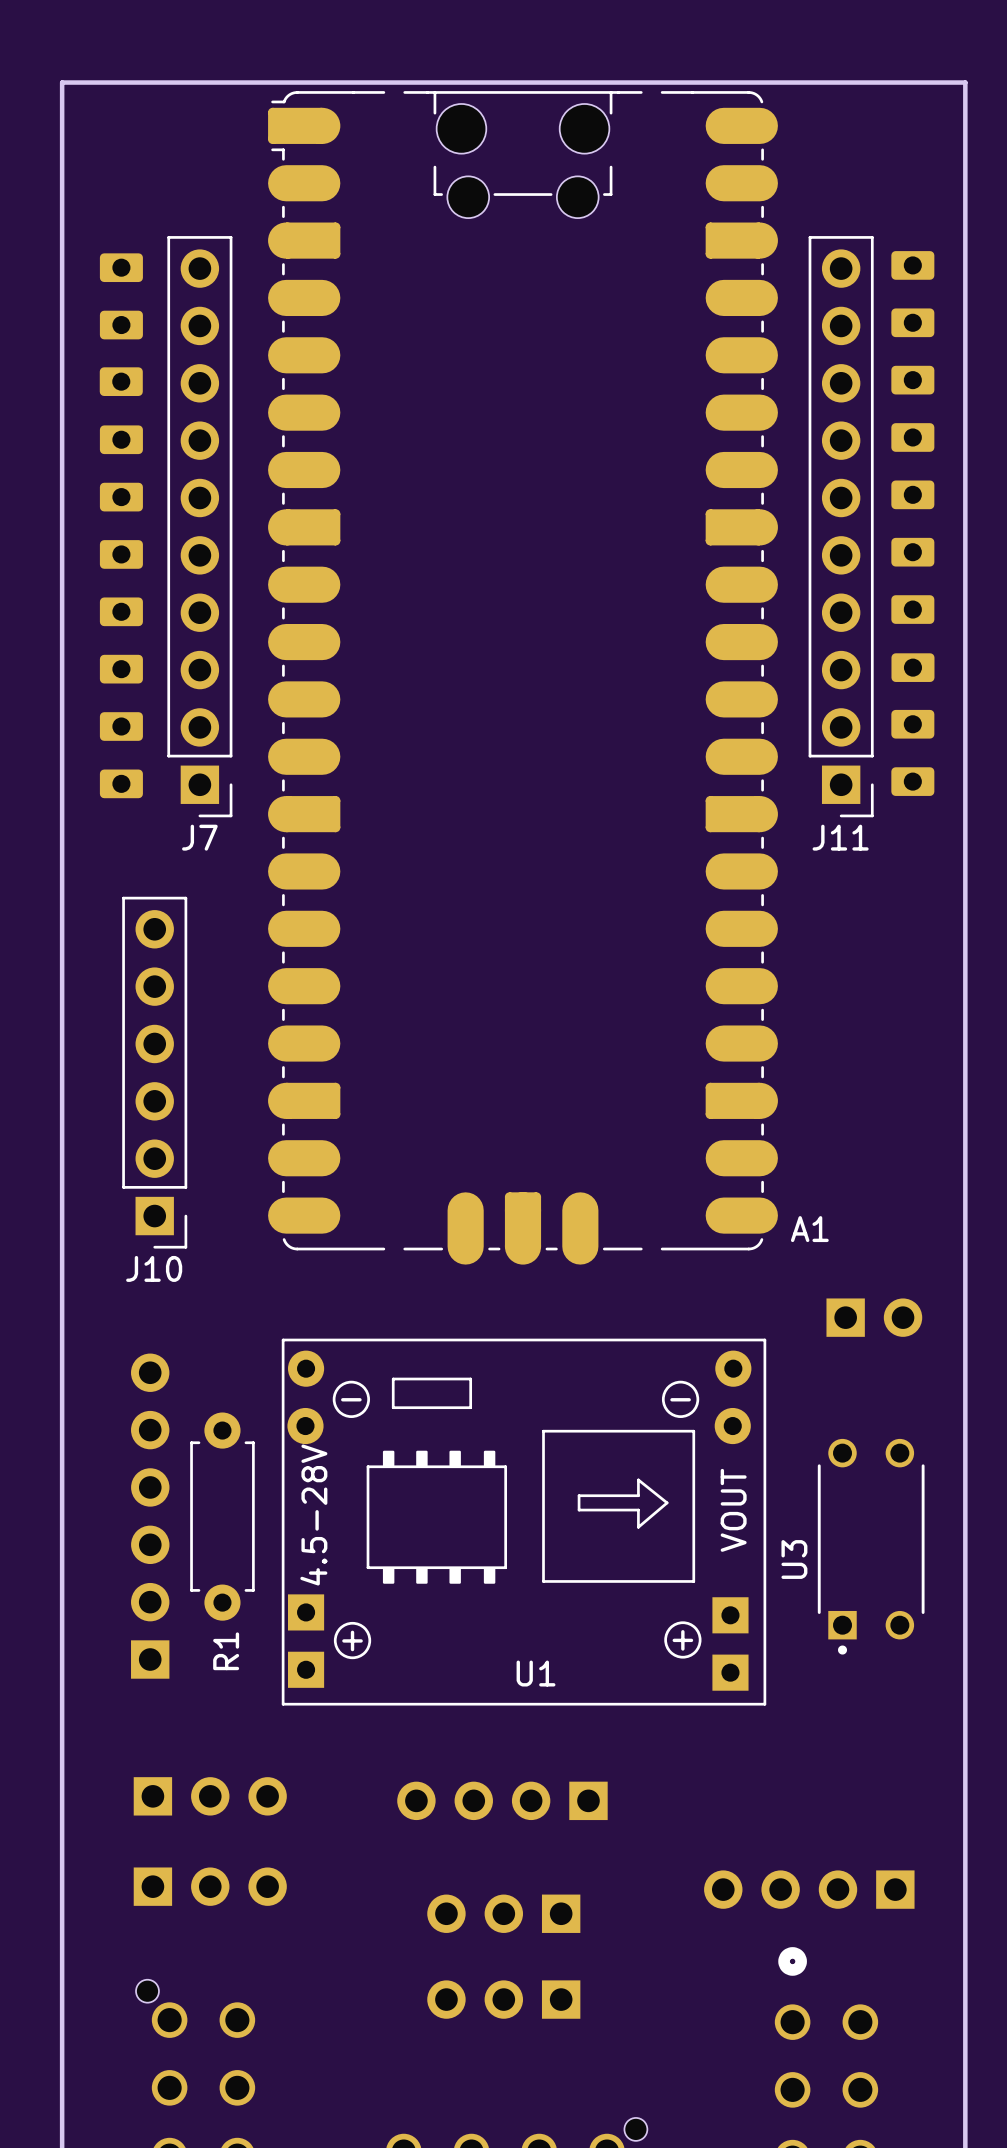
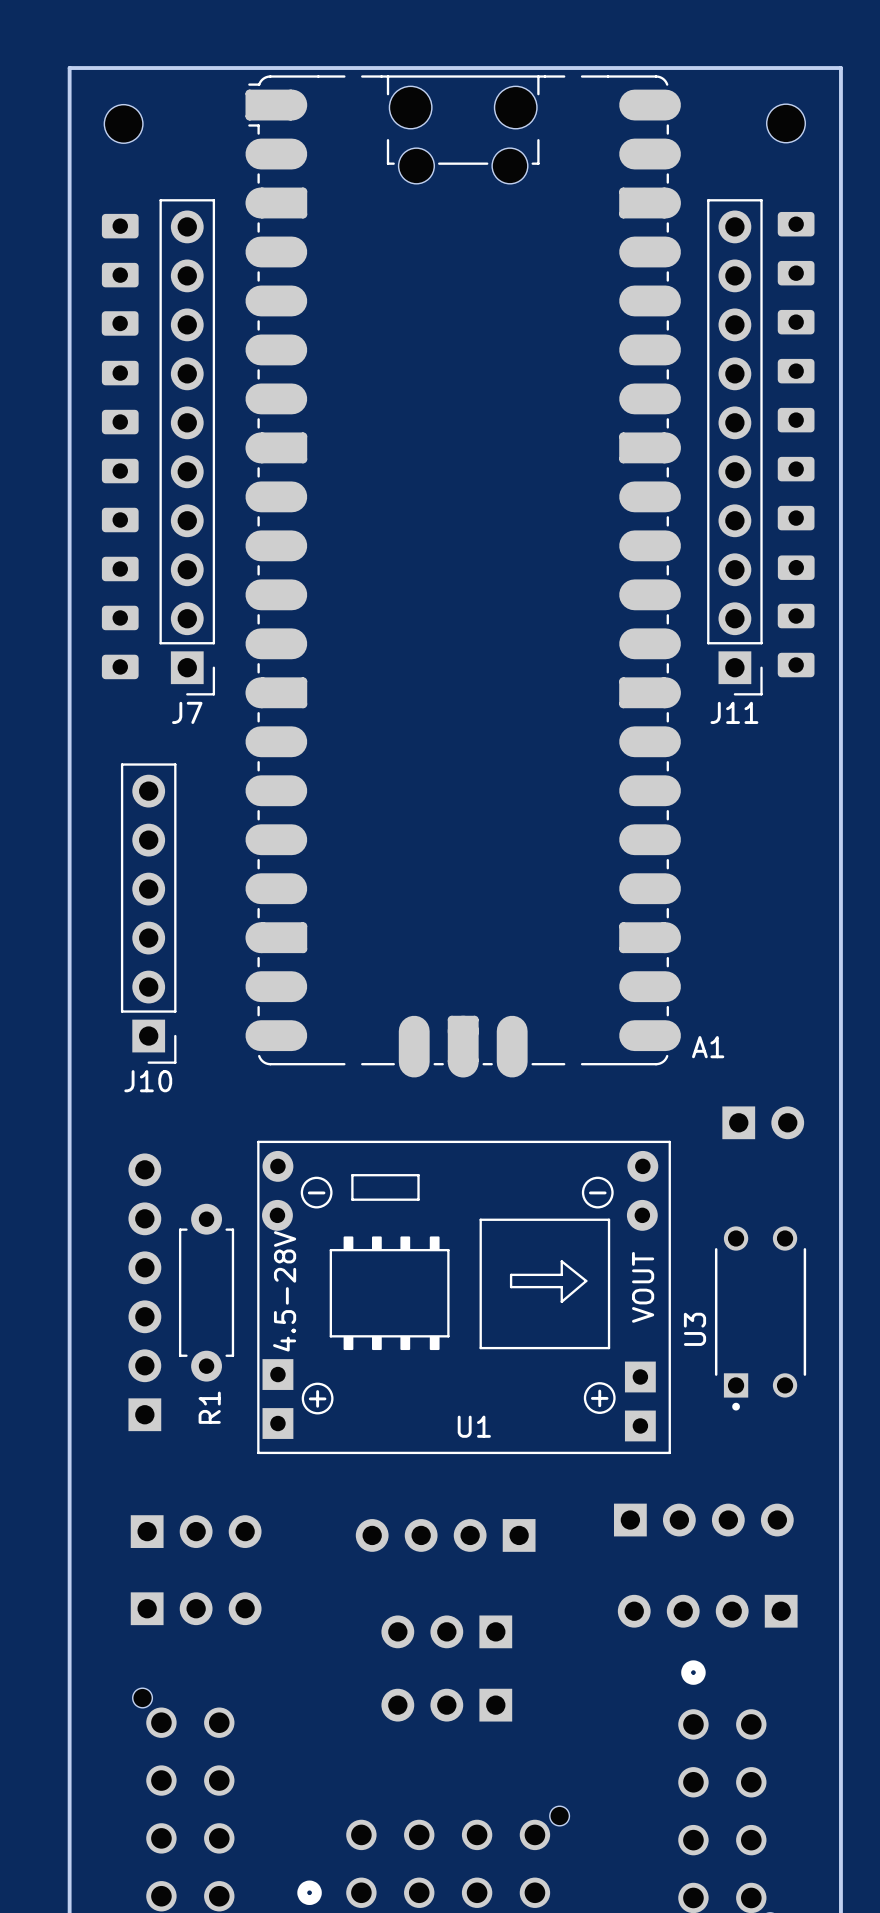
part: none -> (786, 123)
part: none -> (123, 123)
part: none -> (703, 1520)

